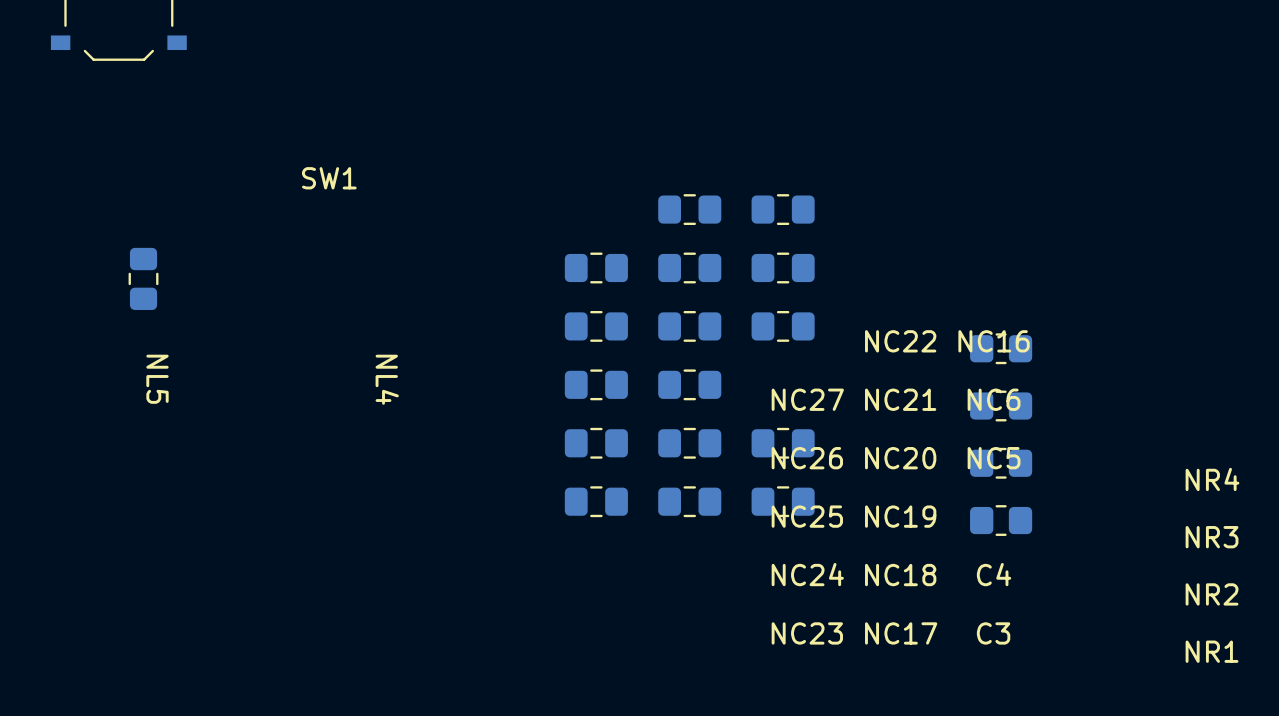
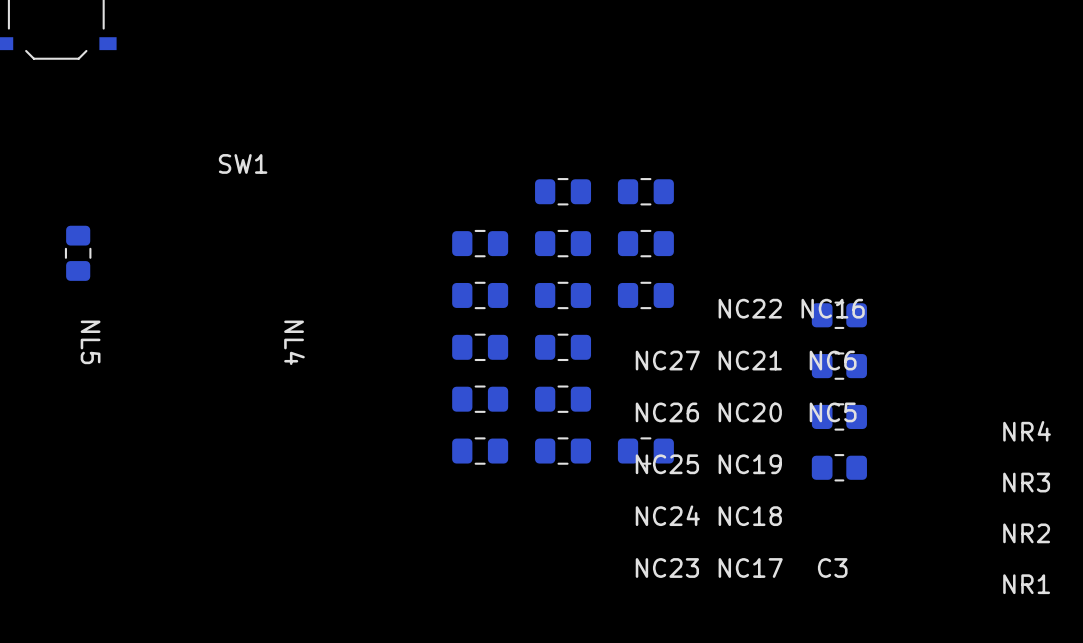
C4: (783, 443) -> none

